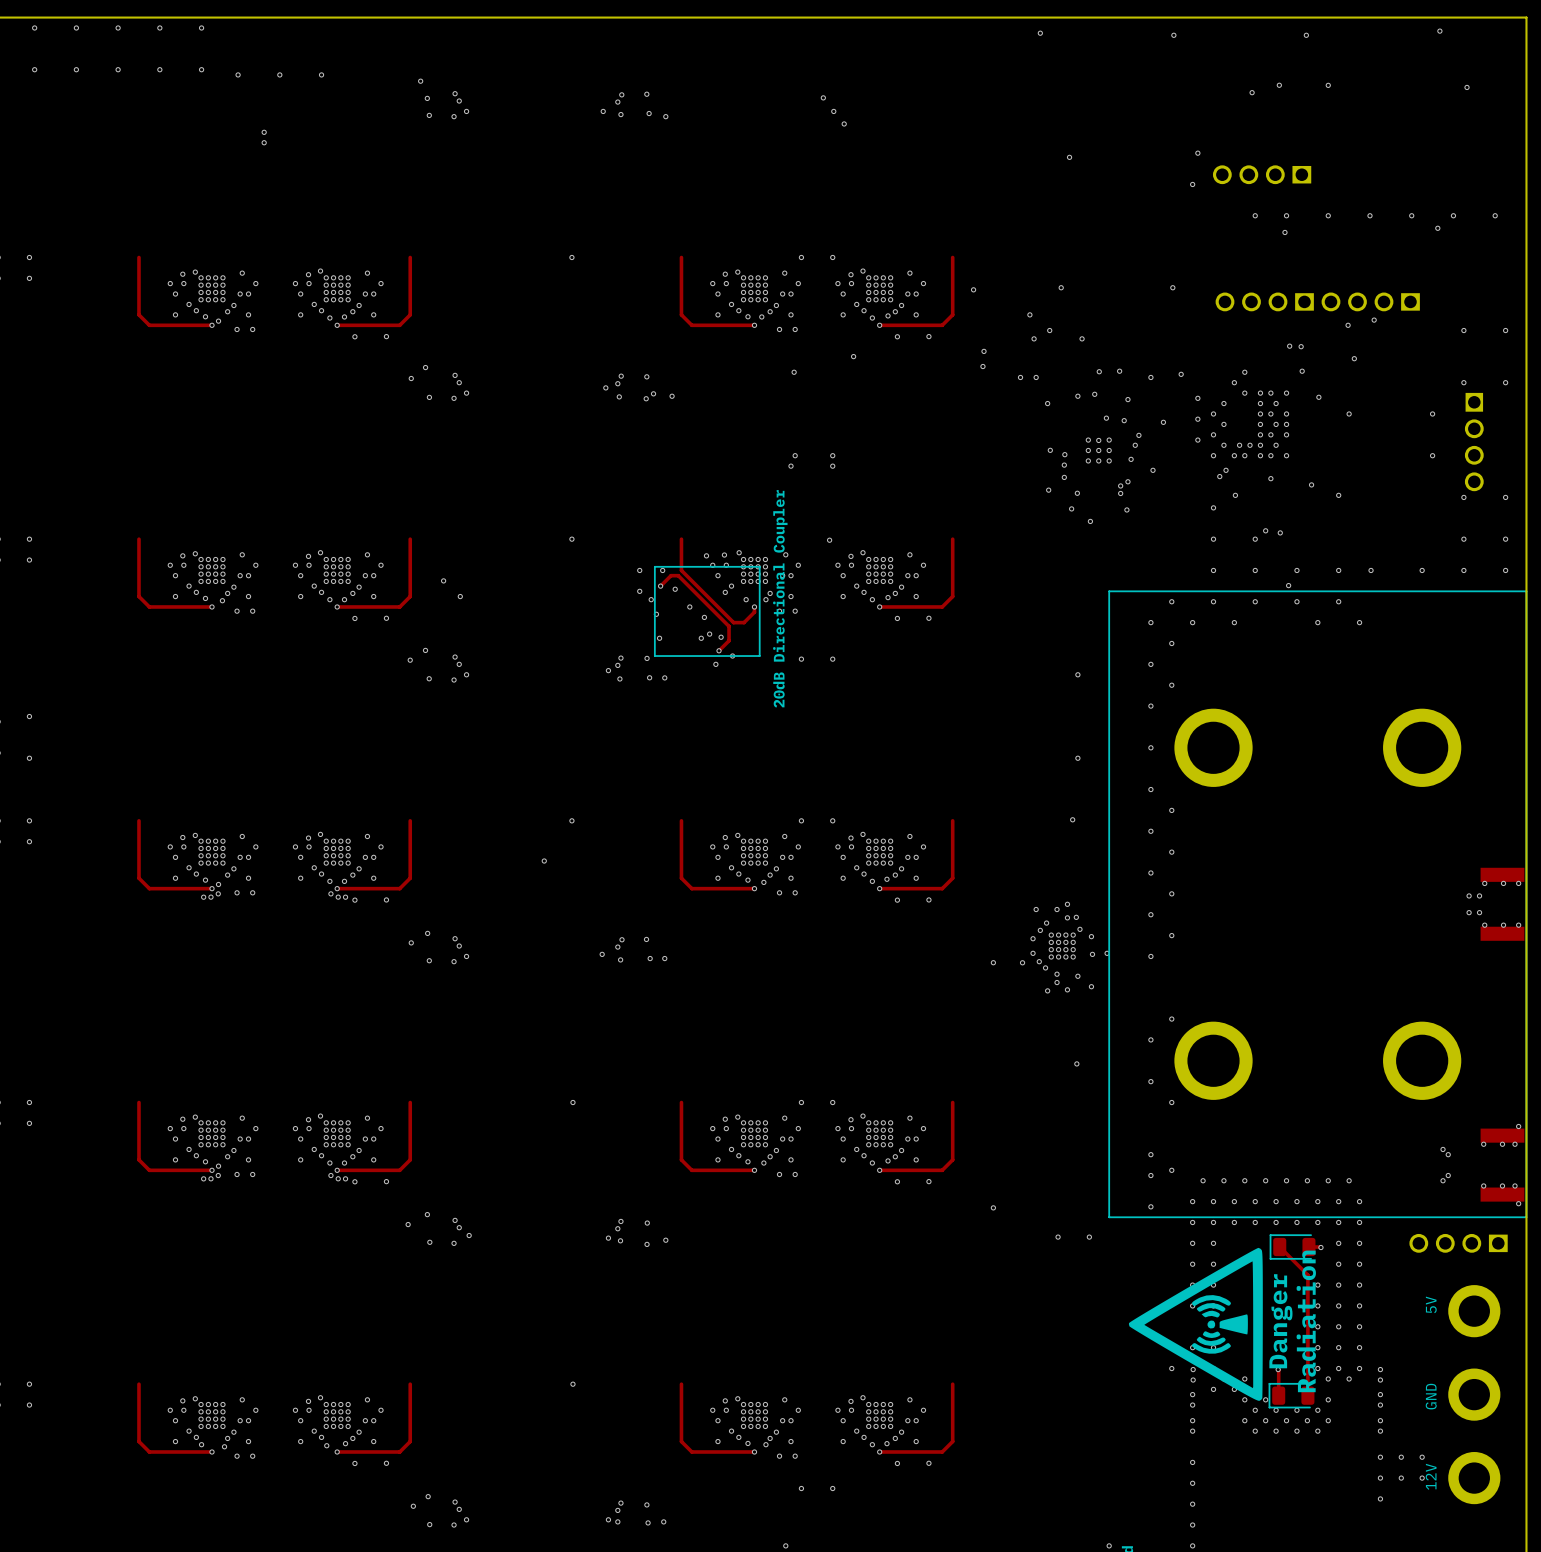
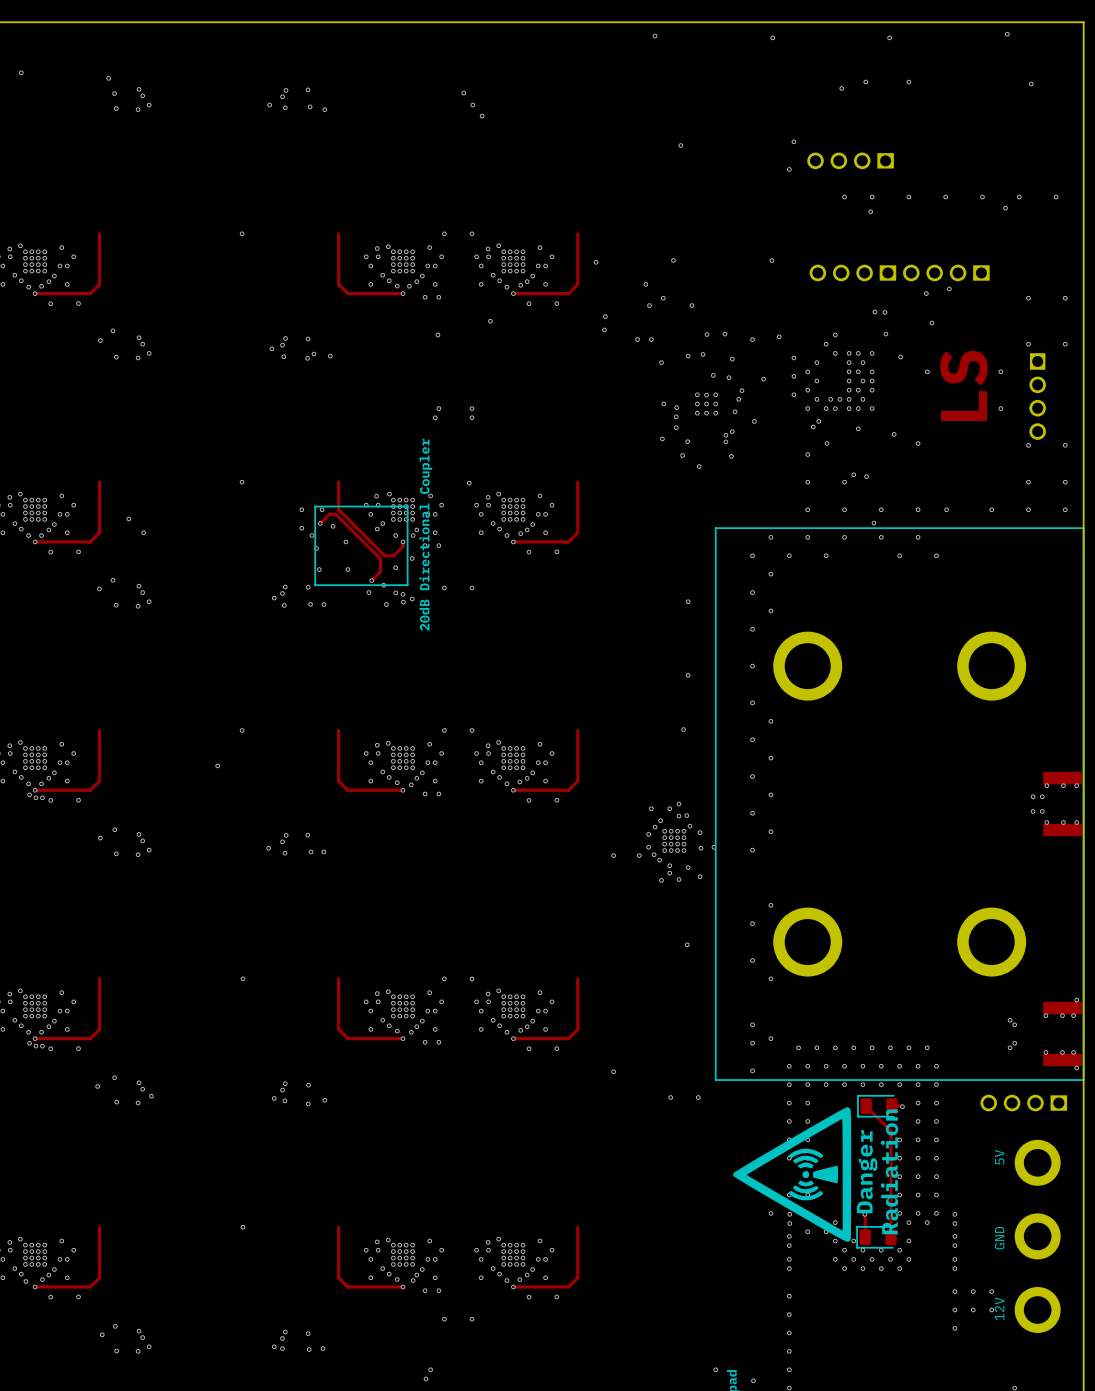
text: none -> LS (963, 385)
via: (706, 555) -> none
via: (704, 617) -> none
via: none -> (412, 558)
via: (709, 634) -> none
via: none -> (395, 567)
via: (721, 637) -> none
via: none -> (347, 569)
via: (701, 638) -> none
via: none -> (395, 592)
via: none -> (403, 594)
via: none -> (412, 598)
via: none -> (403, 602)
via: none -> (386, 604)

